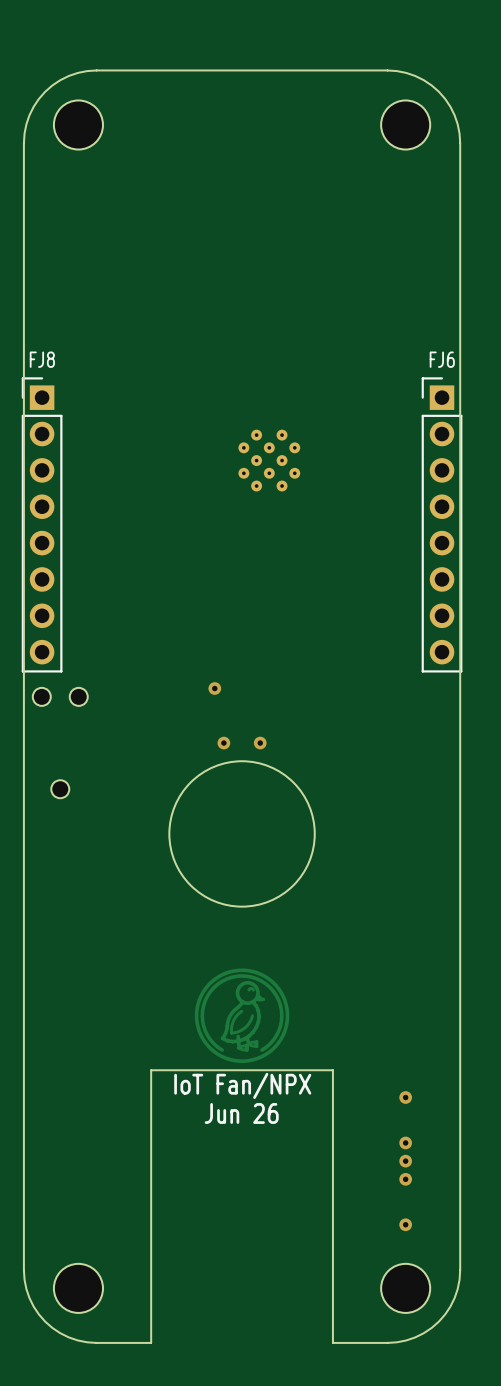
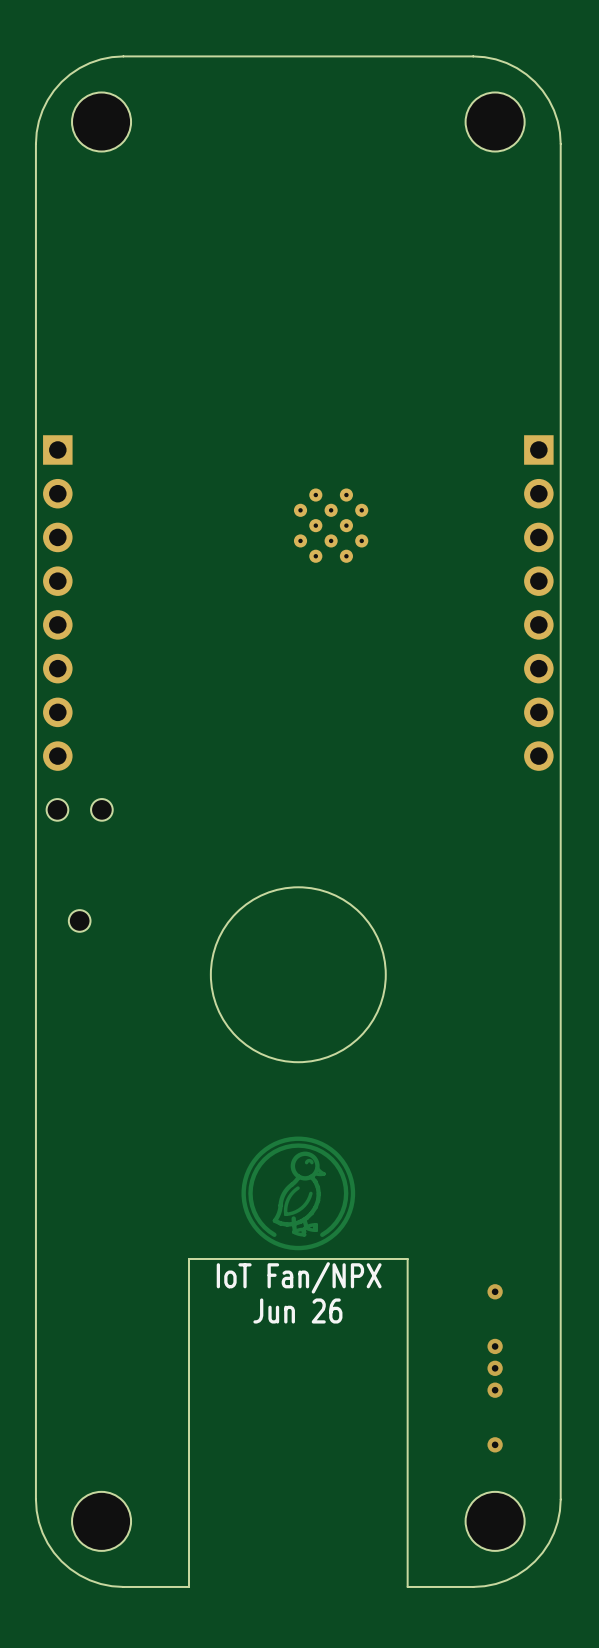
FJ8 side: bottom (42, 524) -> top (57, 603)
FJ6 side: bottom (442, 524) -> top (538, 603)
via: (214, 688) -> none
via: (223, 743) -> none
via: (260, 743) -> none

